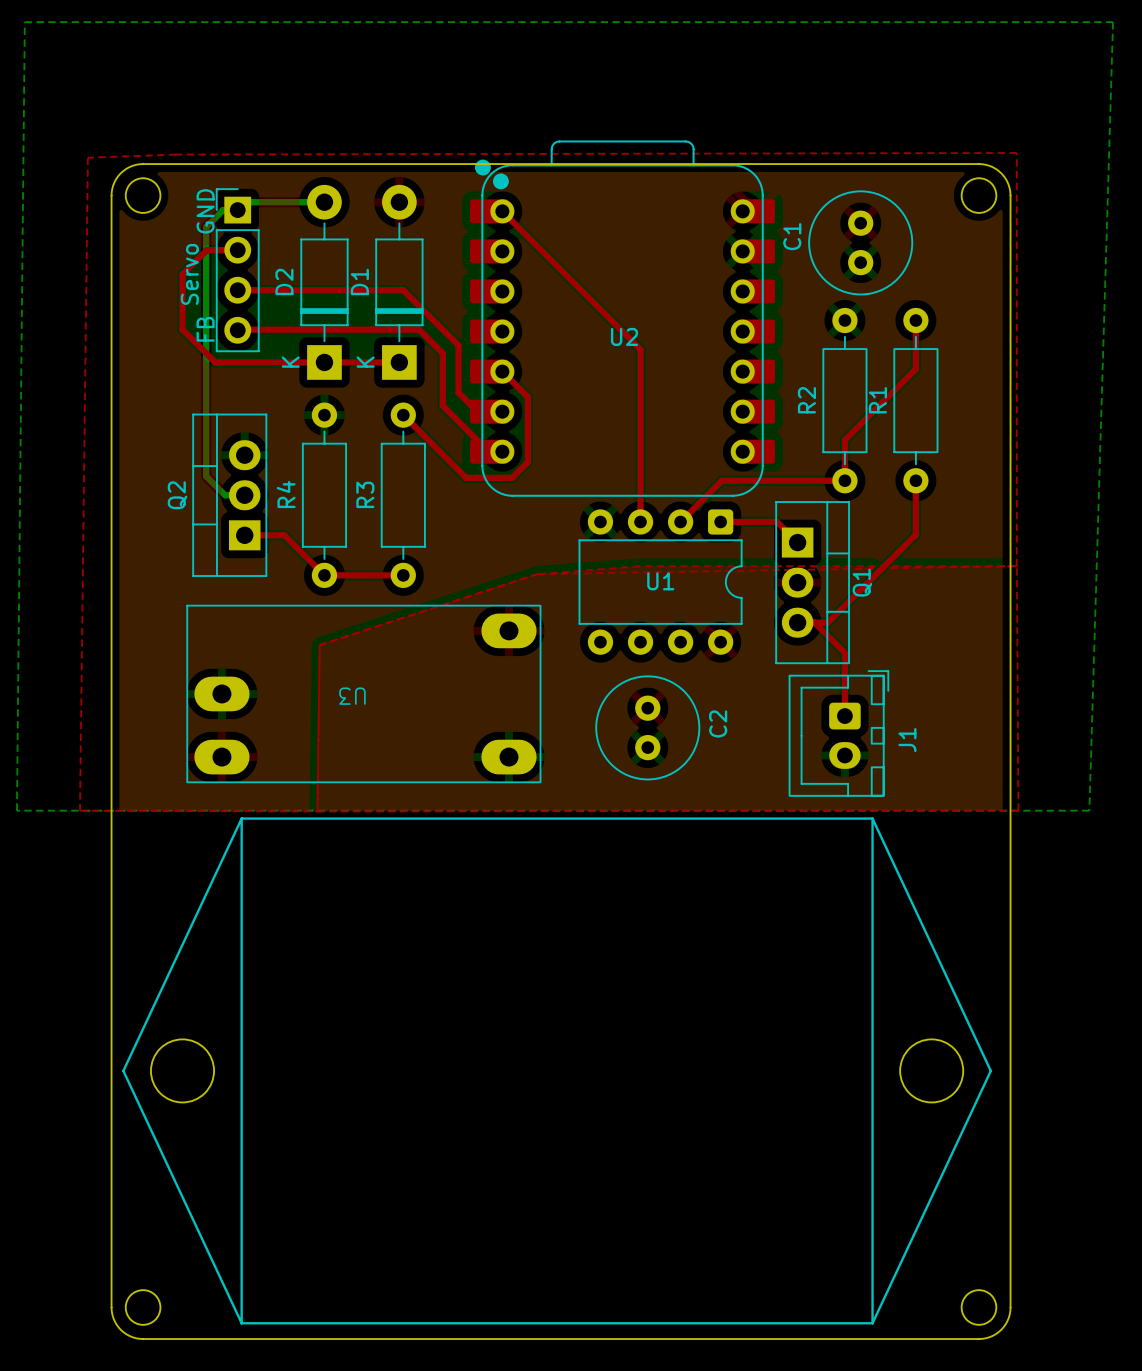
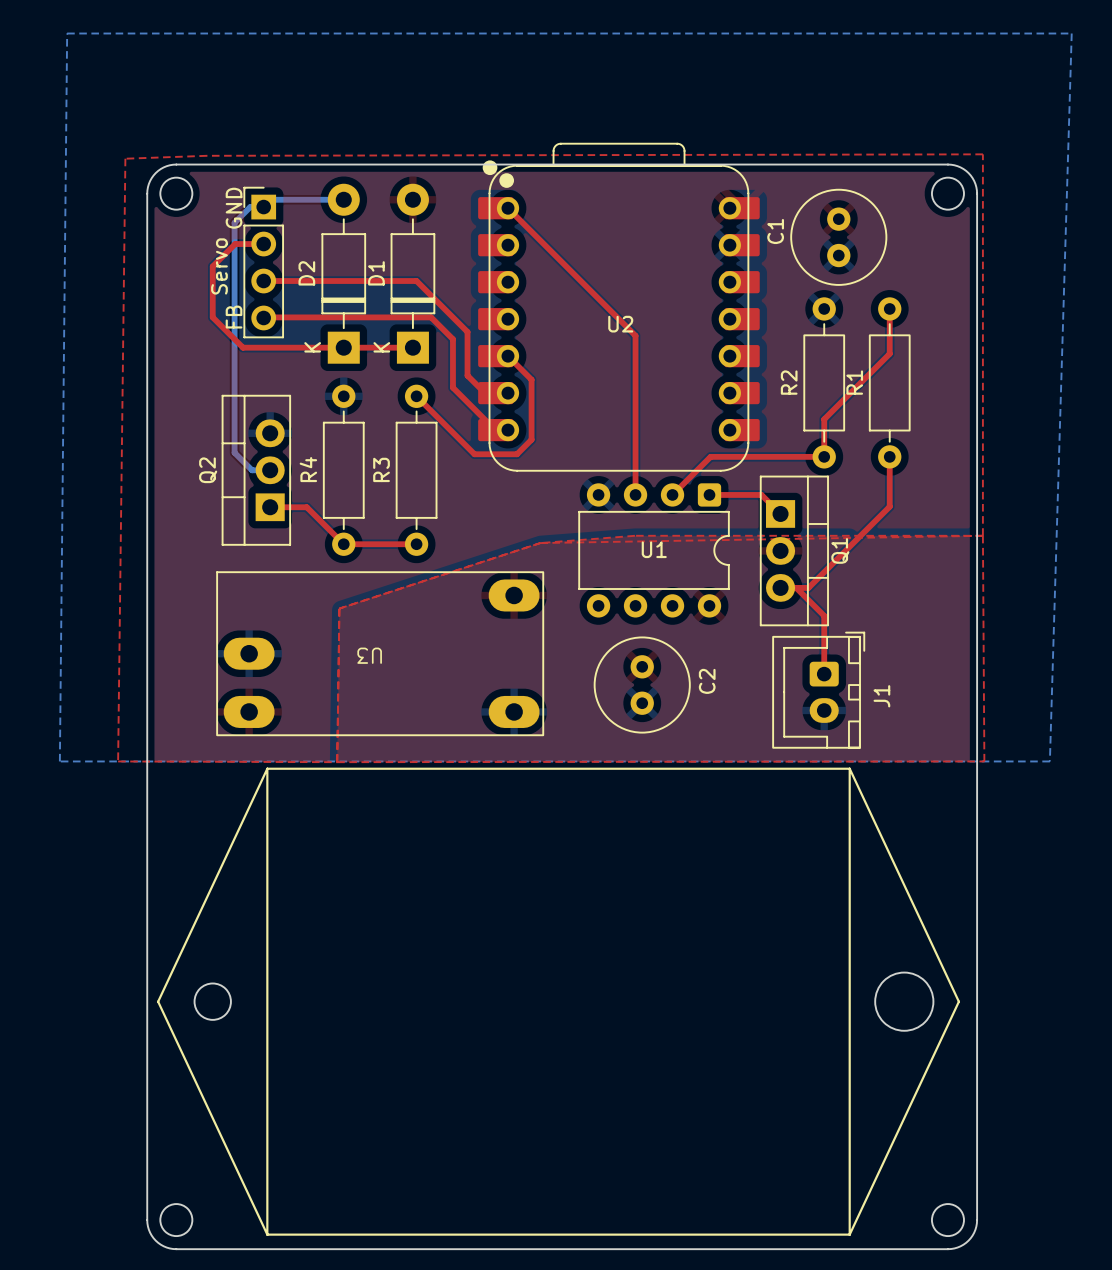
round board edge size: [150, 1038, 215, 1103] -> [194, 983, 232, 1021]

